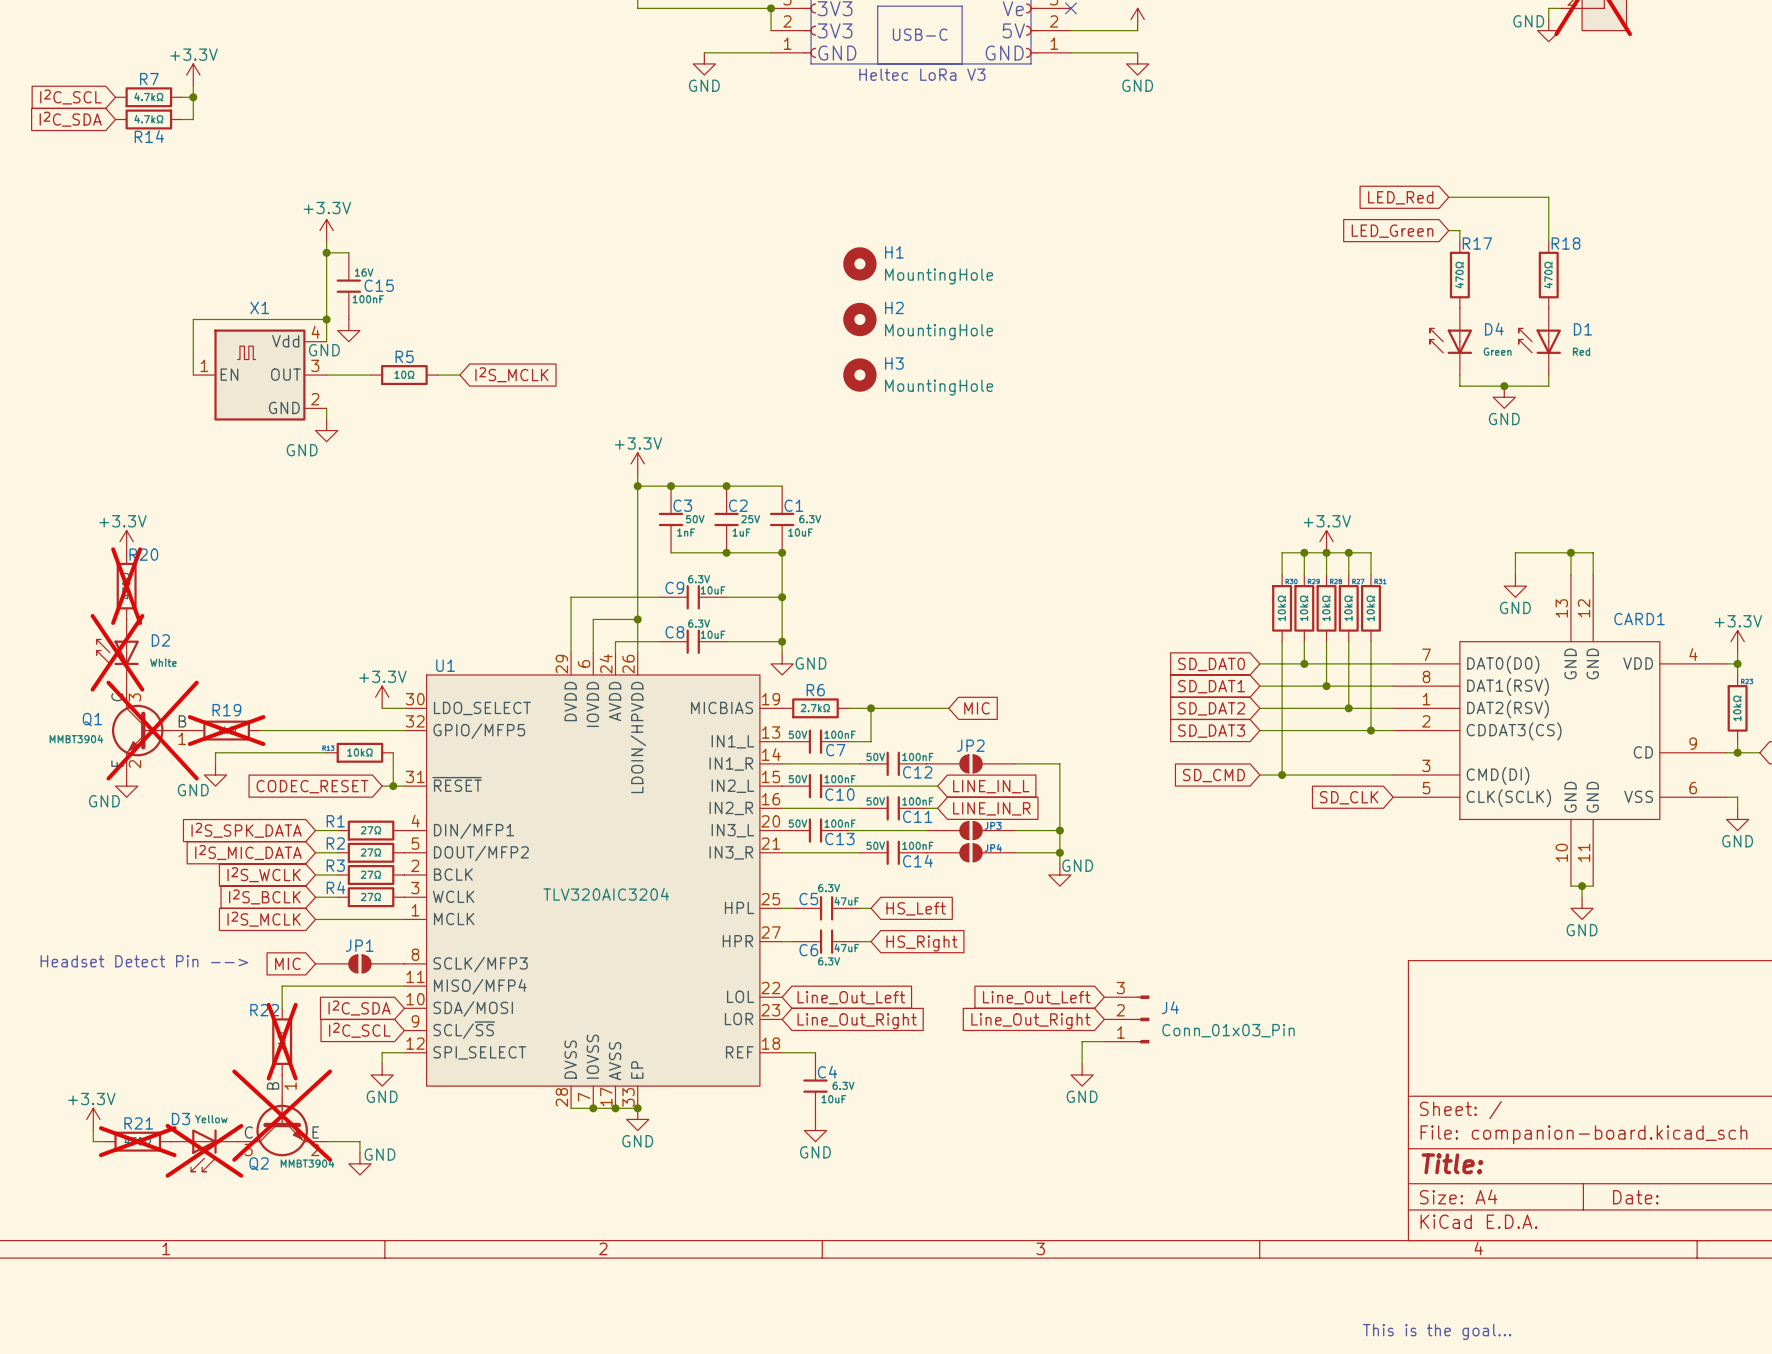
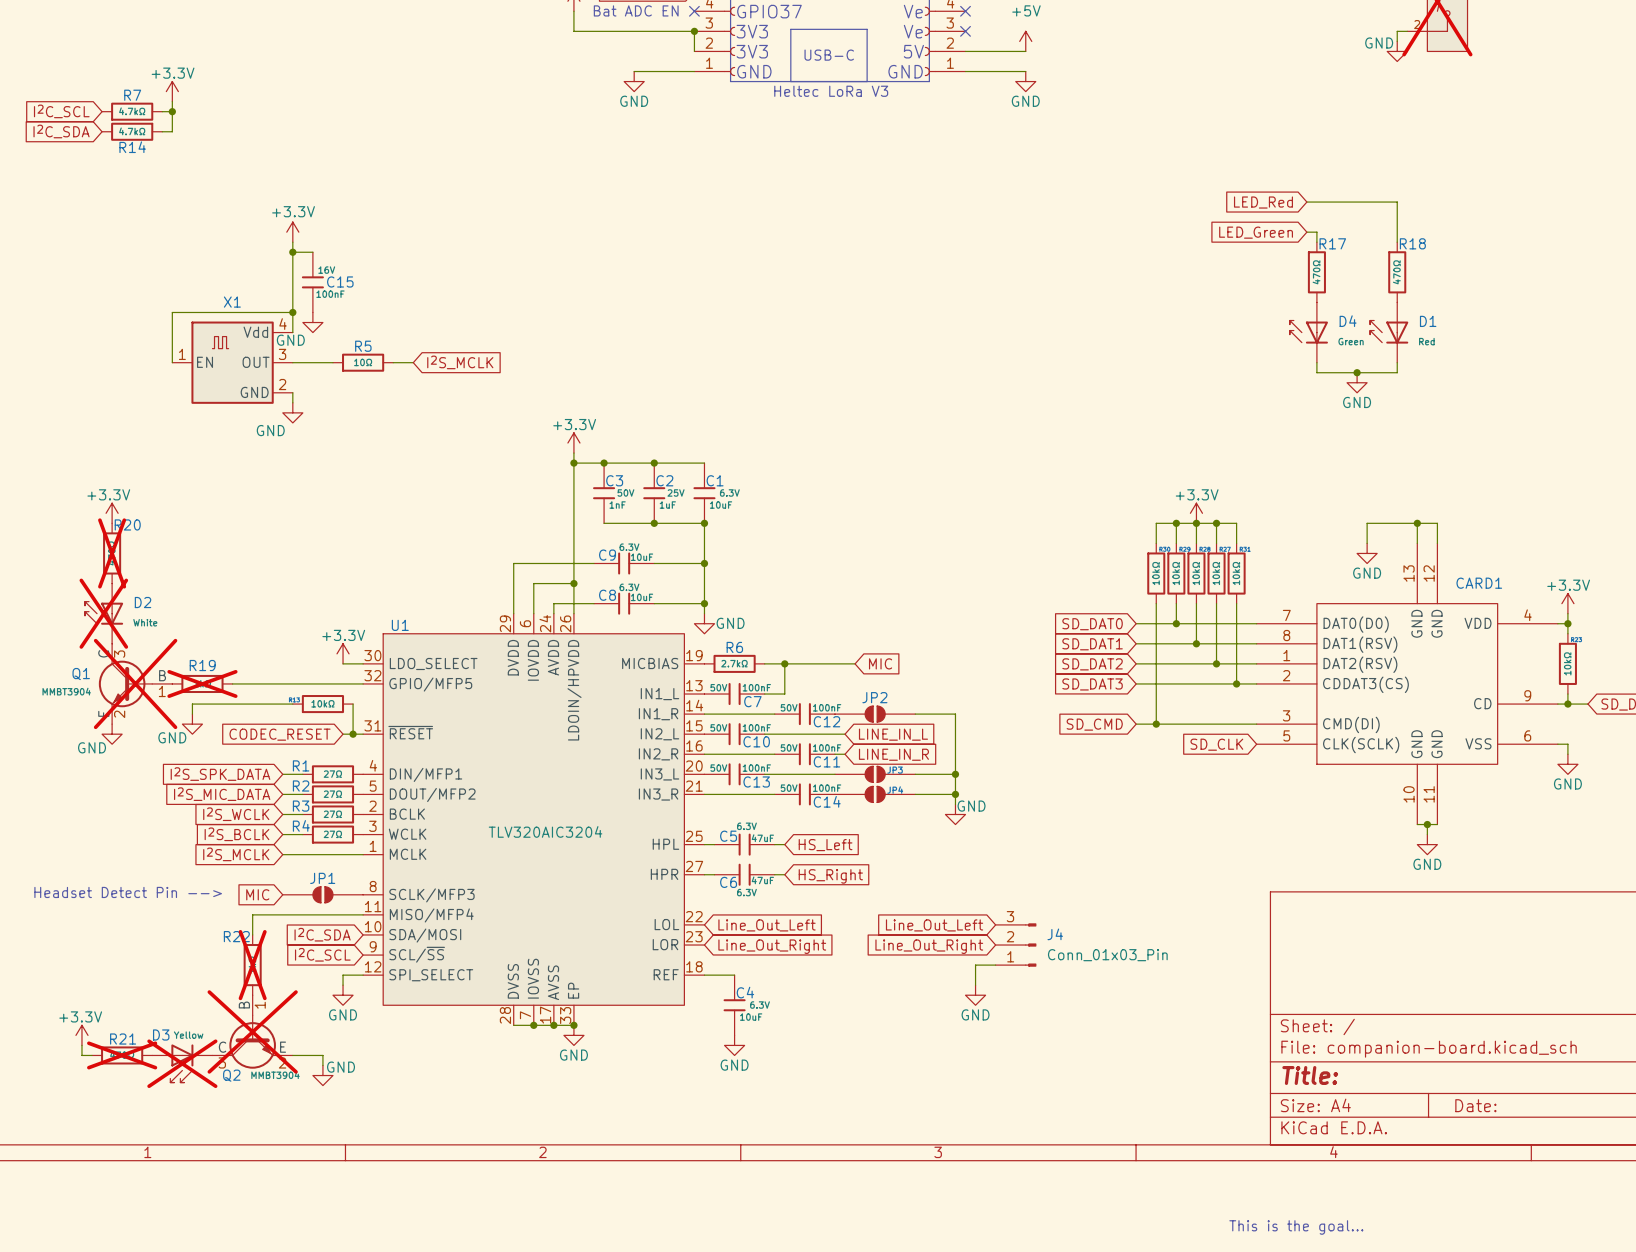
H1: MountingHole (859, 263) -> none
H2: MountingHole (859, 319) -> none
H3: MountingHole (859, 375) -> none

